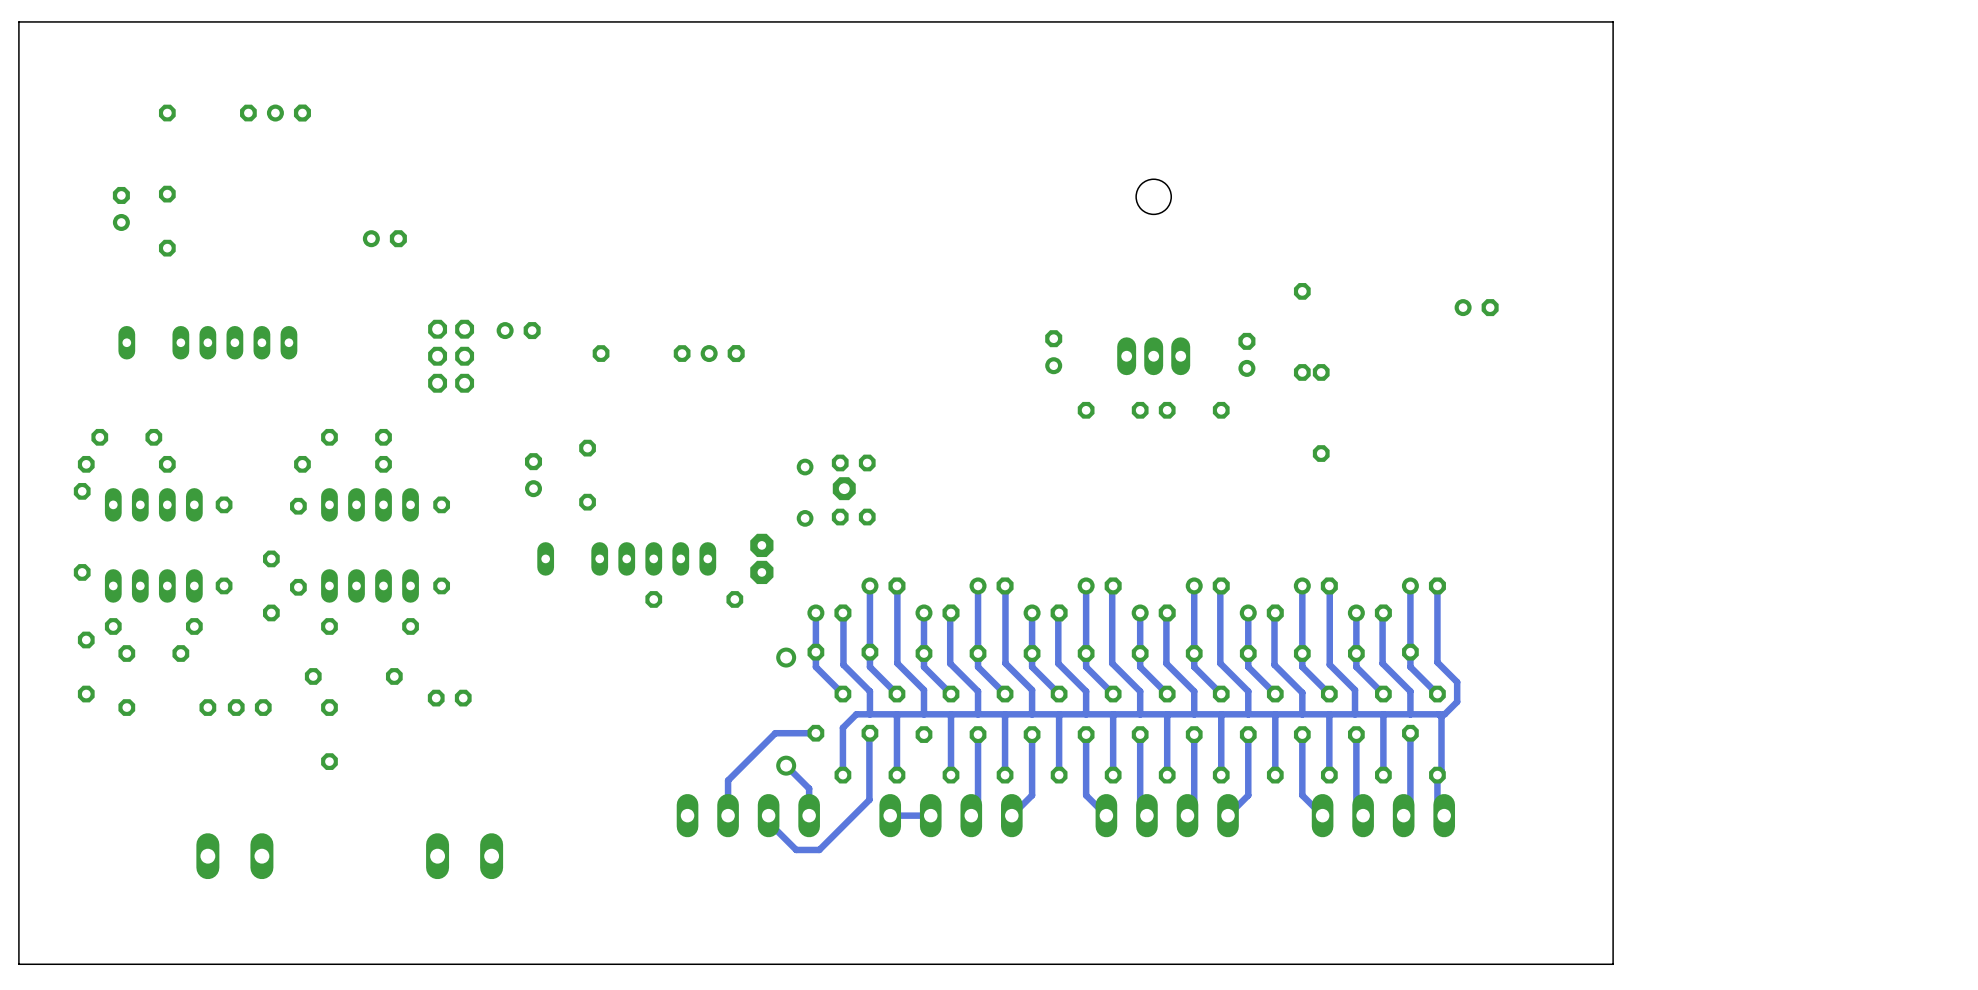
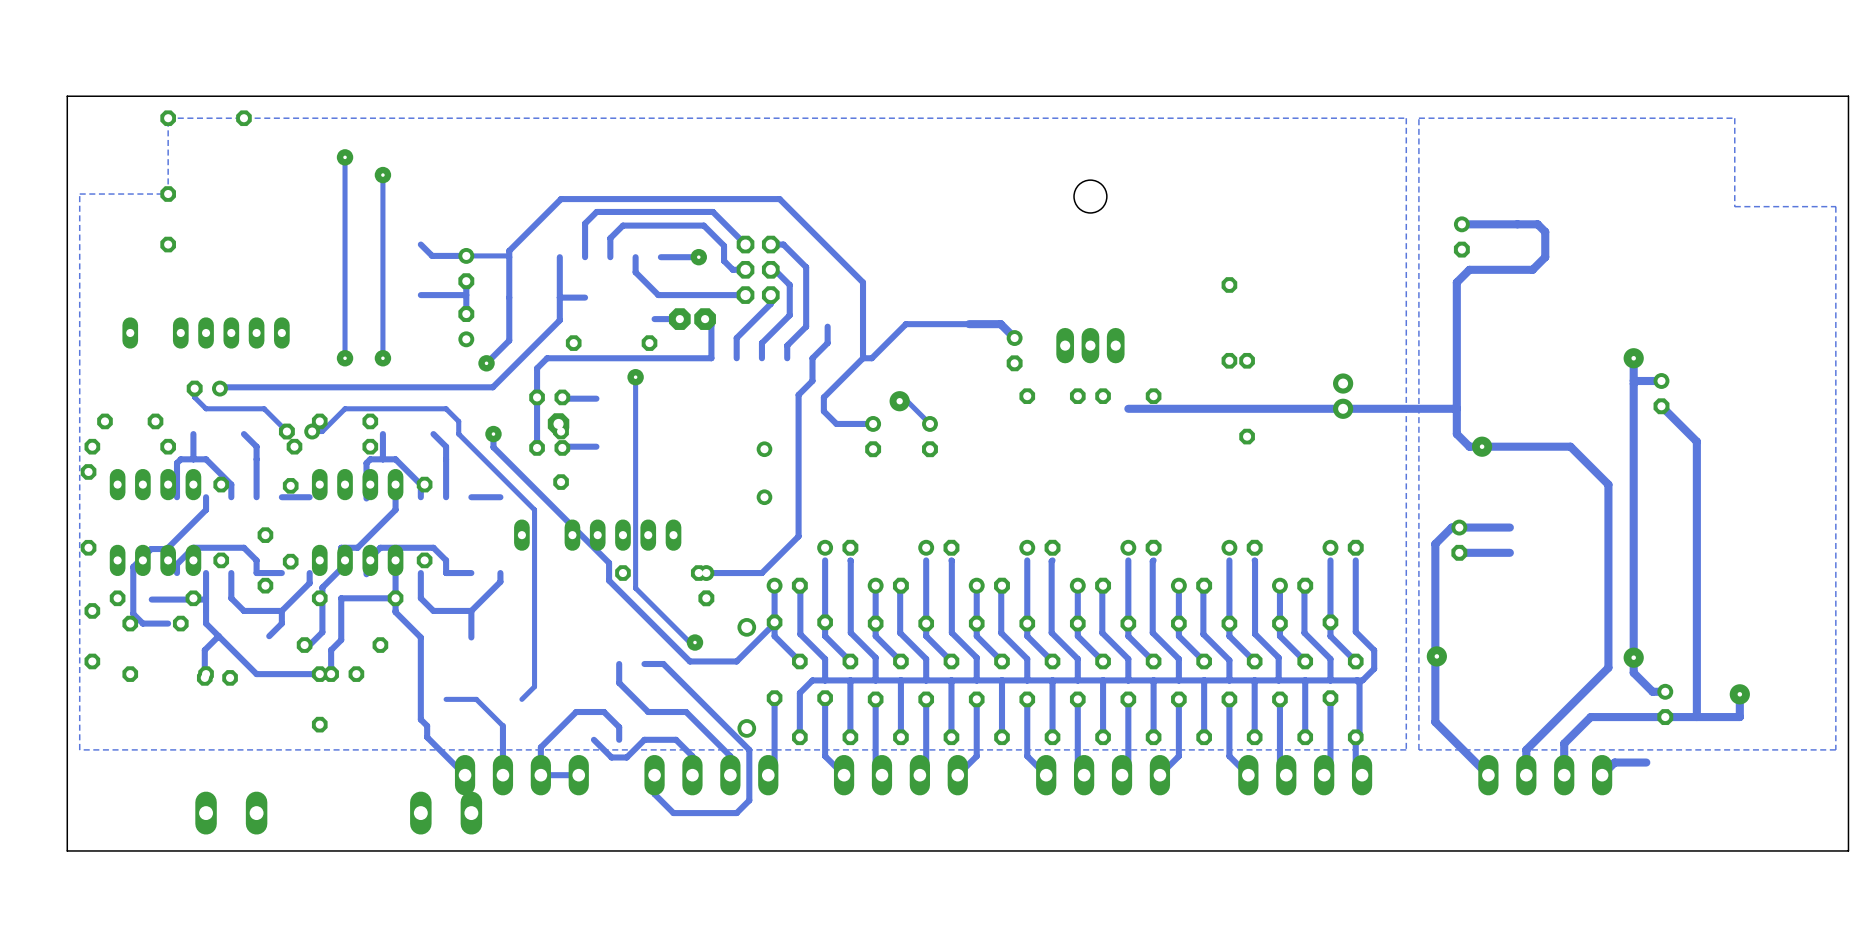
board edge: (1613, 21) (18, 21) (18, 964) (1613, 964) (1613, 21) -> (1848, 96) (1848, 850) (67, 850) (67, 96) (1848, 96)
part: (288, 113) -> none
zone outline: none -> (1406, 118) (168, 118) (168, 194) (79, 194) (79, 749) (1406, 749) (1406, 118)
zone outline: none -> (1734, 118) (1418, 118) (1418, 749) (1835, 749) (1835, 206) (1734, 206) (1734, 118)
track: none -> (345, 157) (345, 358)
via: none -> (345, 157)
track: none -> (382, 175) (382, 358)
via: none -> (382, 175)
part: (121, 208) -> none
track: none -> (1461, 224) (1537, 224) (1545, 231) (1545, 257) (1532, 269) (1469, 269) (1456, 282) (1456, 434) (1469, 446) (1570, 446) (1608, 484) (1608, 667) (1526, 749) (1526, 775)
part: (384, 238) -> none
track: none -> (420, 244) (432, 255) (509, 257)
track: none -> (745, 244) (712, 211) (596, 211) (585, 223) (585, 257)
track: none -> (770, 244) (783, 244) (806, 267) (806, 326) (787, 345) (787, 358)
track: none -> (559, 257) (559, 320) (492, 387) (219, 388)
track: none -> (610, 257) (610, 238) (622, 225) (703, 225) (724, 245) (724, 260) (732, 269) (745, 269)
track: none -> (635, 257) (635, 272) (658, 295) (745, 295)
track: none -> (698, 257) (660, 257)
via: none -> (698, 257)
part: none -> (466, 268)
part: none -> (758, 269)
track: none -> (770, 269) (774, 269) (789, 284) (789, 315) (761, 343) (761, 358)
track: none -> (420, 295) (466, 295) (466, 281) (466, 314)
track: none -> (770, 295) (770, 303) (736, 338) (736, 358)
track: none -> (585, 297) (559, 297)
part rotation: 0° (1476, 307) -> 90° clockwise (1461, 236)
part position: (1476, 307) -> (1461, 236)
track: none -> (679, 319) (654, 319)
track: none -> (705, 319) (711, 325) (711, 358) (547, 358) (537, 368) (537, 447)
part: (518, 330) -> none
part: none -> (466, 326)
track: none -> (827, 326) (827, 343) (812, 358) (812, 381) (798, 394) (798, 536) (761, 573) (706, 573)
track: none -> (1014, 338) (1000, 324) (905, 324) (871, 358) (863, 358)
part rotation: 0° (1053, 352) -> 180° (1014, 350)
part: (722, 353) -> none
part: (1246, 354) -> none
part: (451, 356) -> none
via: none -> (345, 358)
via: none -> (382, 358)
track: none -> (863, 358) (823, 397) (823, 411) (836, 423) (873, 423)
track: none -> (863, 358) (863, 282) (779, 199) (561, 199) (509, 250) (509, 340) (486, 363)
track: none -> (1633, 358) (1633, 381) (1661, 381)
via: none -> (1633, 358)
via: none -> (486, 363)
track: none -> (635, 377) (635, 588) (689, 642) (694, 642)
via: none -> (635, 377)
track: none -> (1636, 381) (1633, 383) (1633, 672) (1652, 691) (1665, 691)
via: none -> (1343, 383)
track: none -> (194, 388) (194, 397) (206, 408) (264, 408) (286, 431)
part: none -> (207, 388)
part: none -> (1661, 393)
part: none -> (549, 397)
track: none -> (562, 397) (596, 398)
track: none -> (899, 401) (907, 401) (929, 423)
via: none -> (899, 401)
track: none -> (1661, 406) (1696, 441) (1696, 717)
via: none -> (1343, 408)
track: none -> (1456, 408) (1128, 408)
part: none -> (299, 431)
track: none -> (312, 431) (322, 431) (345, 408) (446, 408) (458, 421) (458, 434) (534, 509) (534, 686) (521, 699)
track: none -> (193, 434) (193, 459)
track: none -> (243, 434) (256, 446) (256, 497)
track: none -> (382, 434) (382, 459)
track: none -> (433, 434) (446, 446) (446, 497)
track: none -> (493, 434) (493, 447) (609, 562) (609, 580) (689, 661) (736, 661) (774, 623)
via: none -> (493, 434)
part: none -> (873, 436)
part: none -> (929, 436)
part: (853, 462) -> none
track: none -> (596, 446) (562, 447)
via: none -> (1482, 446)
part: none -> (549, 447)
part: (533, 475) -> none
part position: (844, 488) -> (558, 423)
part: (853, 517) -> none
track: none -> (206, 497) (206, 509) (166, 549) (151, 549) (133, 566) (133, 613) (142, 623) (168, 623)
track: none -> (231, 497) (231, 484) (206, 459) (180, 459) (176, 463) (176, 497)
track: none -> (309, 497) (281, 497)
track: none -> (395, 497) (395, 509) (357, 547) (341, 547) (341, 568) (322, 587) (322, 632) (305, 648)
track: none -> (420, 497) (420, 484) (395, 459) (370, 459) (366, 463) (366, 498)
track: none -> (500, 497) (471, 497)
track: none -> (1509, 527) (1451, 527) (1435, 543) (1435, 722) (1488, 775)
part rotation: 0° (761, 558) -> 90° clockwise (692, 319)
part position: (761, 558) -> (692, 319)
part: none -> (1459, 540)
track: none -> (1509, 552) (1459, 552)
part position: (883, 585) -> (837, 547)
part position: (991, 585) -> (938, 547)
part position: (1099, 585) -> (1039, 547)
part position: (1207, 585) -> (1140, 547)
part position: (1315, 585) -> (1242, 547)
part position: (1423, 585) -> (1343, 547)
track: none -> (206, 573) (206, 623) (256, 674) (331, 674) (331, 650) (341, 639) (341, 598) (395, 598)
track: none -> (231, 573) (231, 598) (243, 610) (281, 610)
track: none -> (281, 573) (256, 573) (256, 560) (243, 547) (193, 547) (176, 564) (176, 573)
track: none -> (309, 573) (309, 583) (281, 610)
track: none -> (395, 573) (395, 612) (420, 637) (420, 719) (427, 725) (427, 737) (465, 775)
track: none -> (420, 573) (420, 598) (433, 610) (471, 610)
track: none -> (471, 573) (446, 573) (446, 560) (433, 547) (380, 547) (366, 561) (366, 574)
track: none -> (500, 573) (500, 581) (471, 610)
part: none -> (706, 585)
track: none -> (206, 598) (151, 599)
track: none -> (281, 610) (281, 623) (269, 636)
track: none -> (471, 610) (471, 637)
track: none -> (218, 636) (204, 650) (204, 677)
via: none -> (694, 642)
via: none -> (1436, 656)
via: none -> (1633, 657)
track: none -> (619, 664) (619, 682) (648, 712) (686, 712) (730, 756) (730, 775)
track: none -> (644, 664) (663, 664) (749, 749) (749, 800) (736, 813) (673, 813) (654, 794) (654, 775)
part: (449, 698) -> none
part position: (249, 707) -> (217, 677)
part: none -> (343, 674)
track: none -> (1739, 694) (1739, 717) (1590, 717) (1564, 743) (1564, 775)
via: none -> (1739, 694)
track: (815, 733) (775, 733) (728, 780) (728, 795) -> (774, 698) (774, 768) (768, 775)
track: (869, 733) (869, 799) (819, 849) (796, 849) (768, 822) (768, 815) -> (825, 698) (825, 756) (844, 775)
track: none -> (446, 699) (476, 699) (502, 725) (502, 775)
part: none -> (1665, 704)
track: (780, 765) (786, 765) (809, 788) (809, 816) -> none
track: none -> (593, 739) (611, 757) (626, 757) (644, 739) (676, 739) (692, 756)
track: none -> (619, 739) (619, 727) (604, 712) (576, 712) (540, 747) (540, 775) (578, 775)
track: none -> (1646, 762) (1614, 762) (1602, 775)
part: none -> (521, 775)
track: (930, 815) (890, 815) -> (881, 775) (875, 768) (875, 699)
part: none -> (1545, 775)

